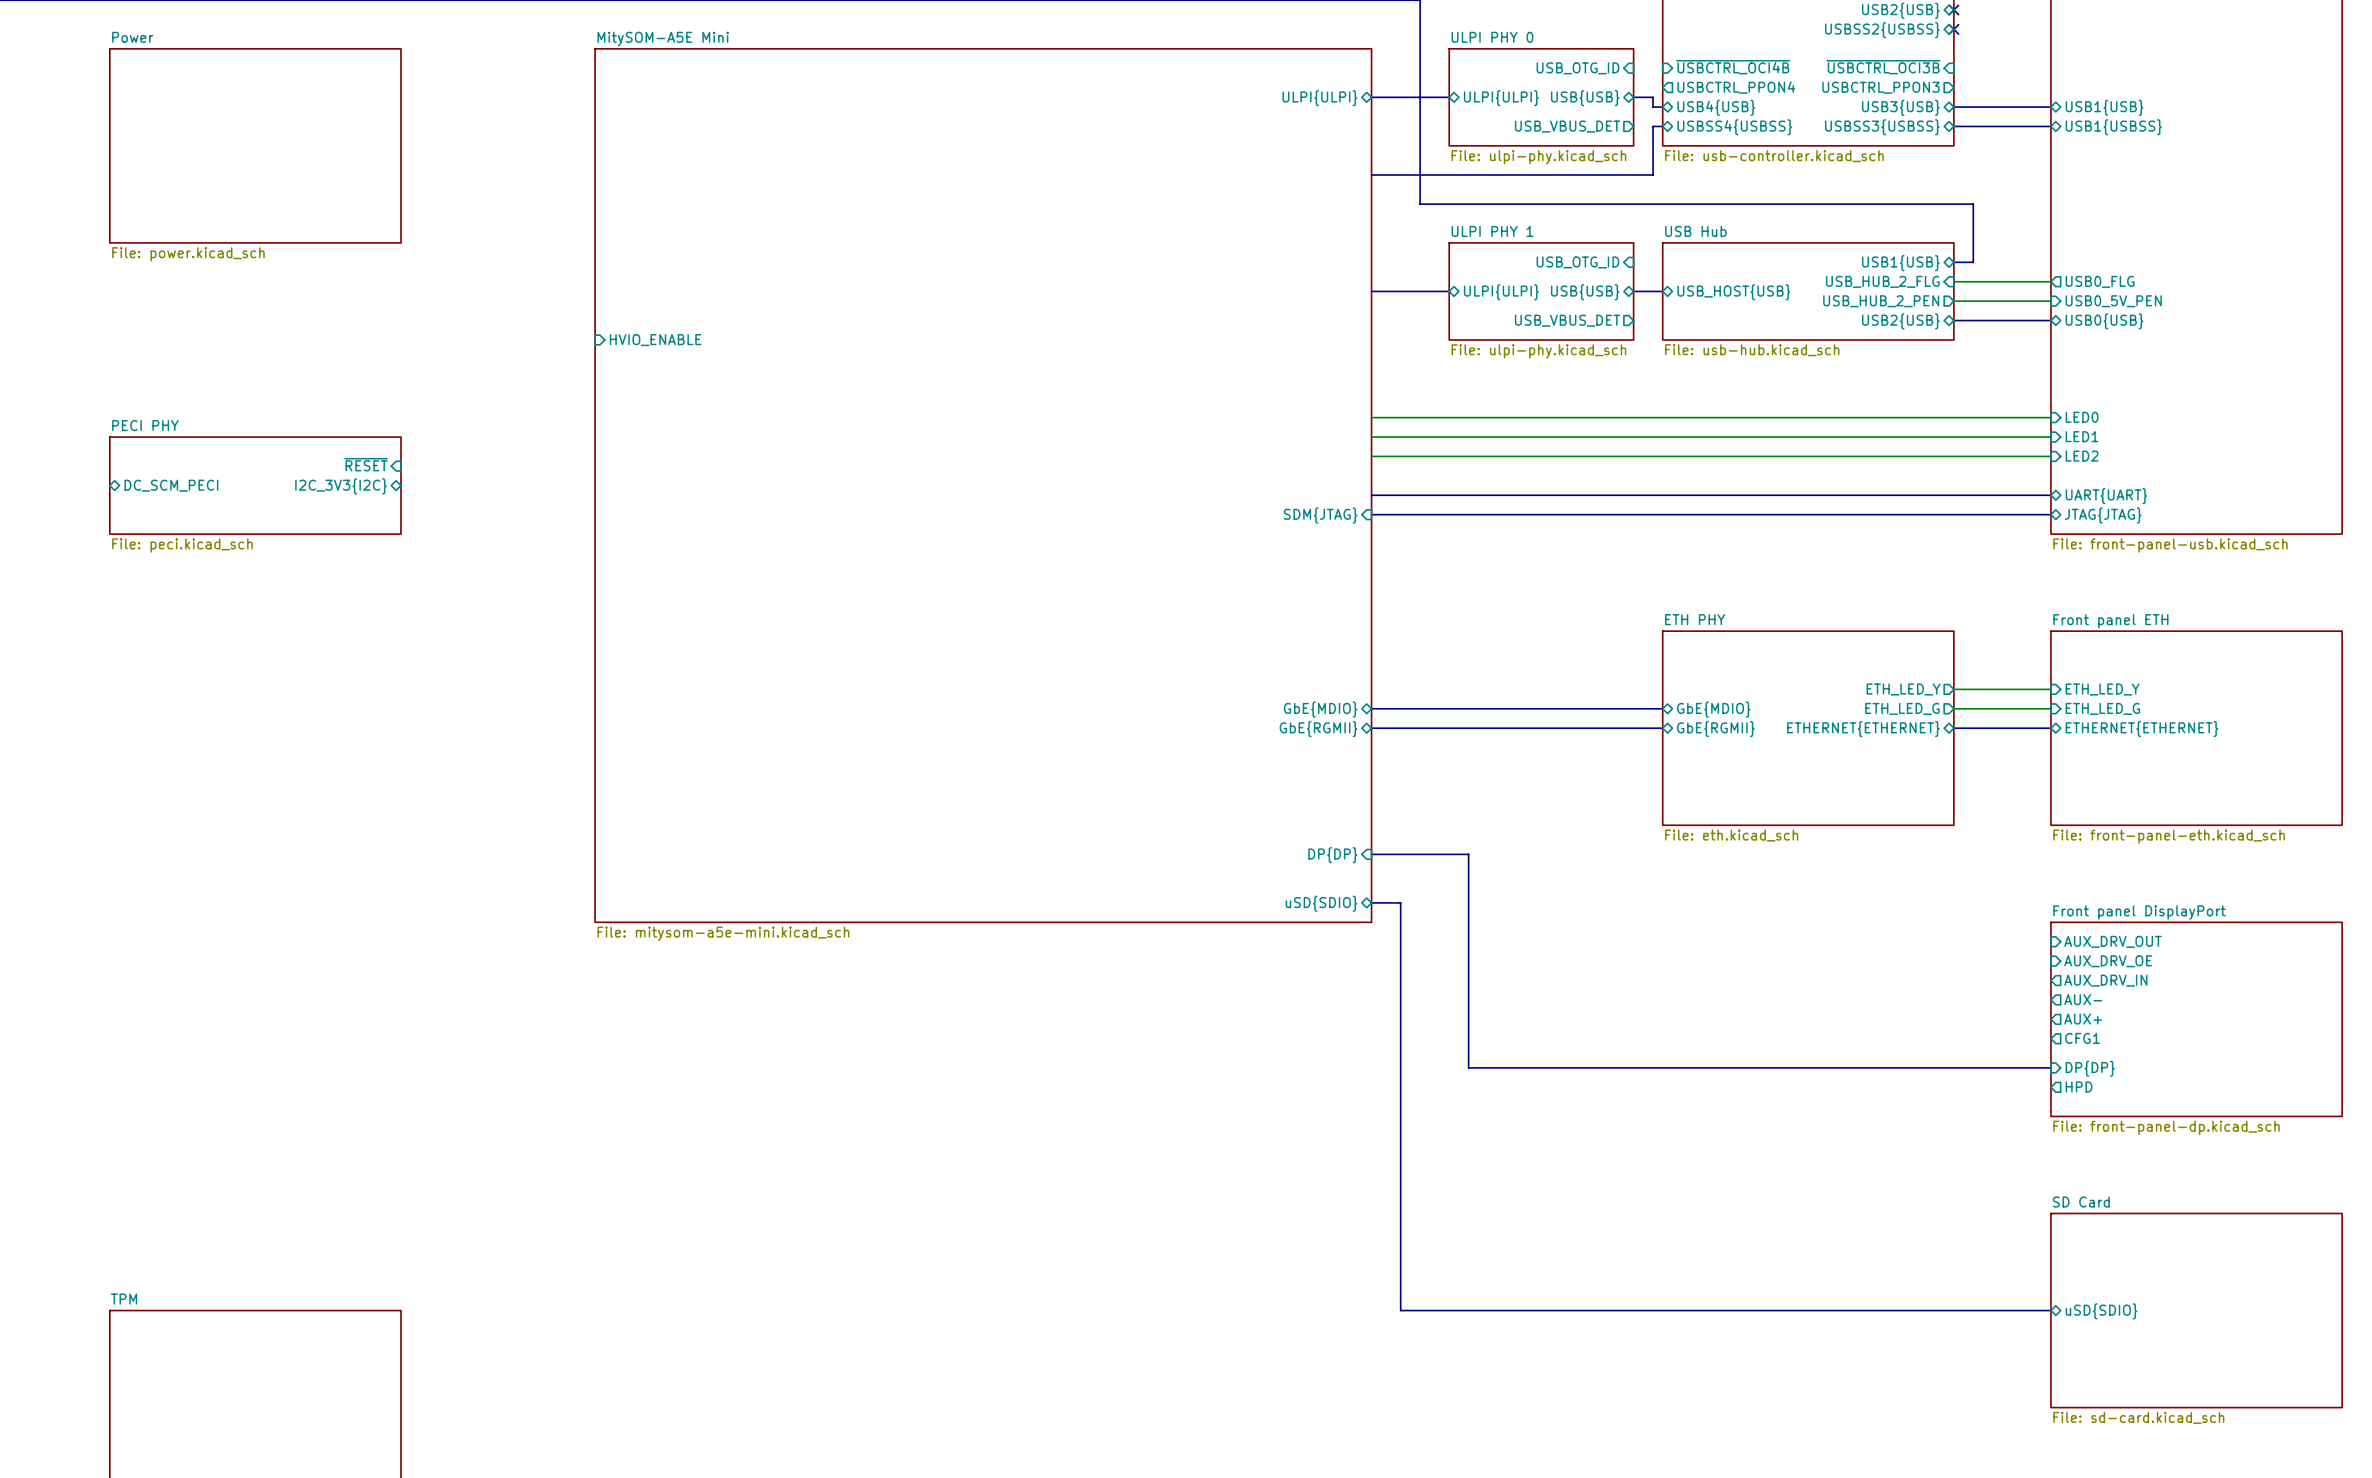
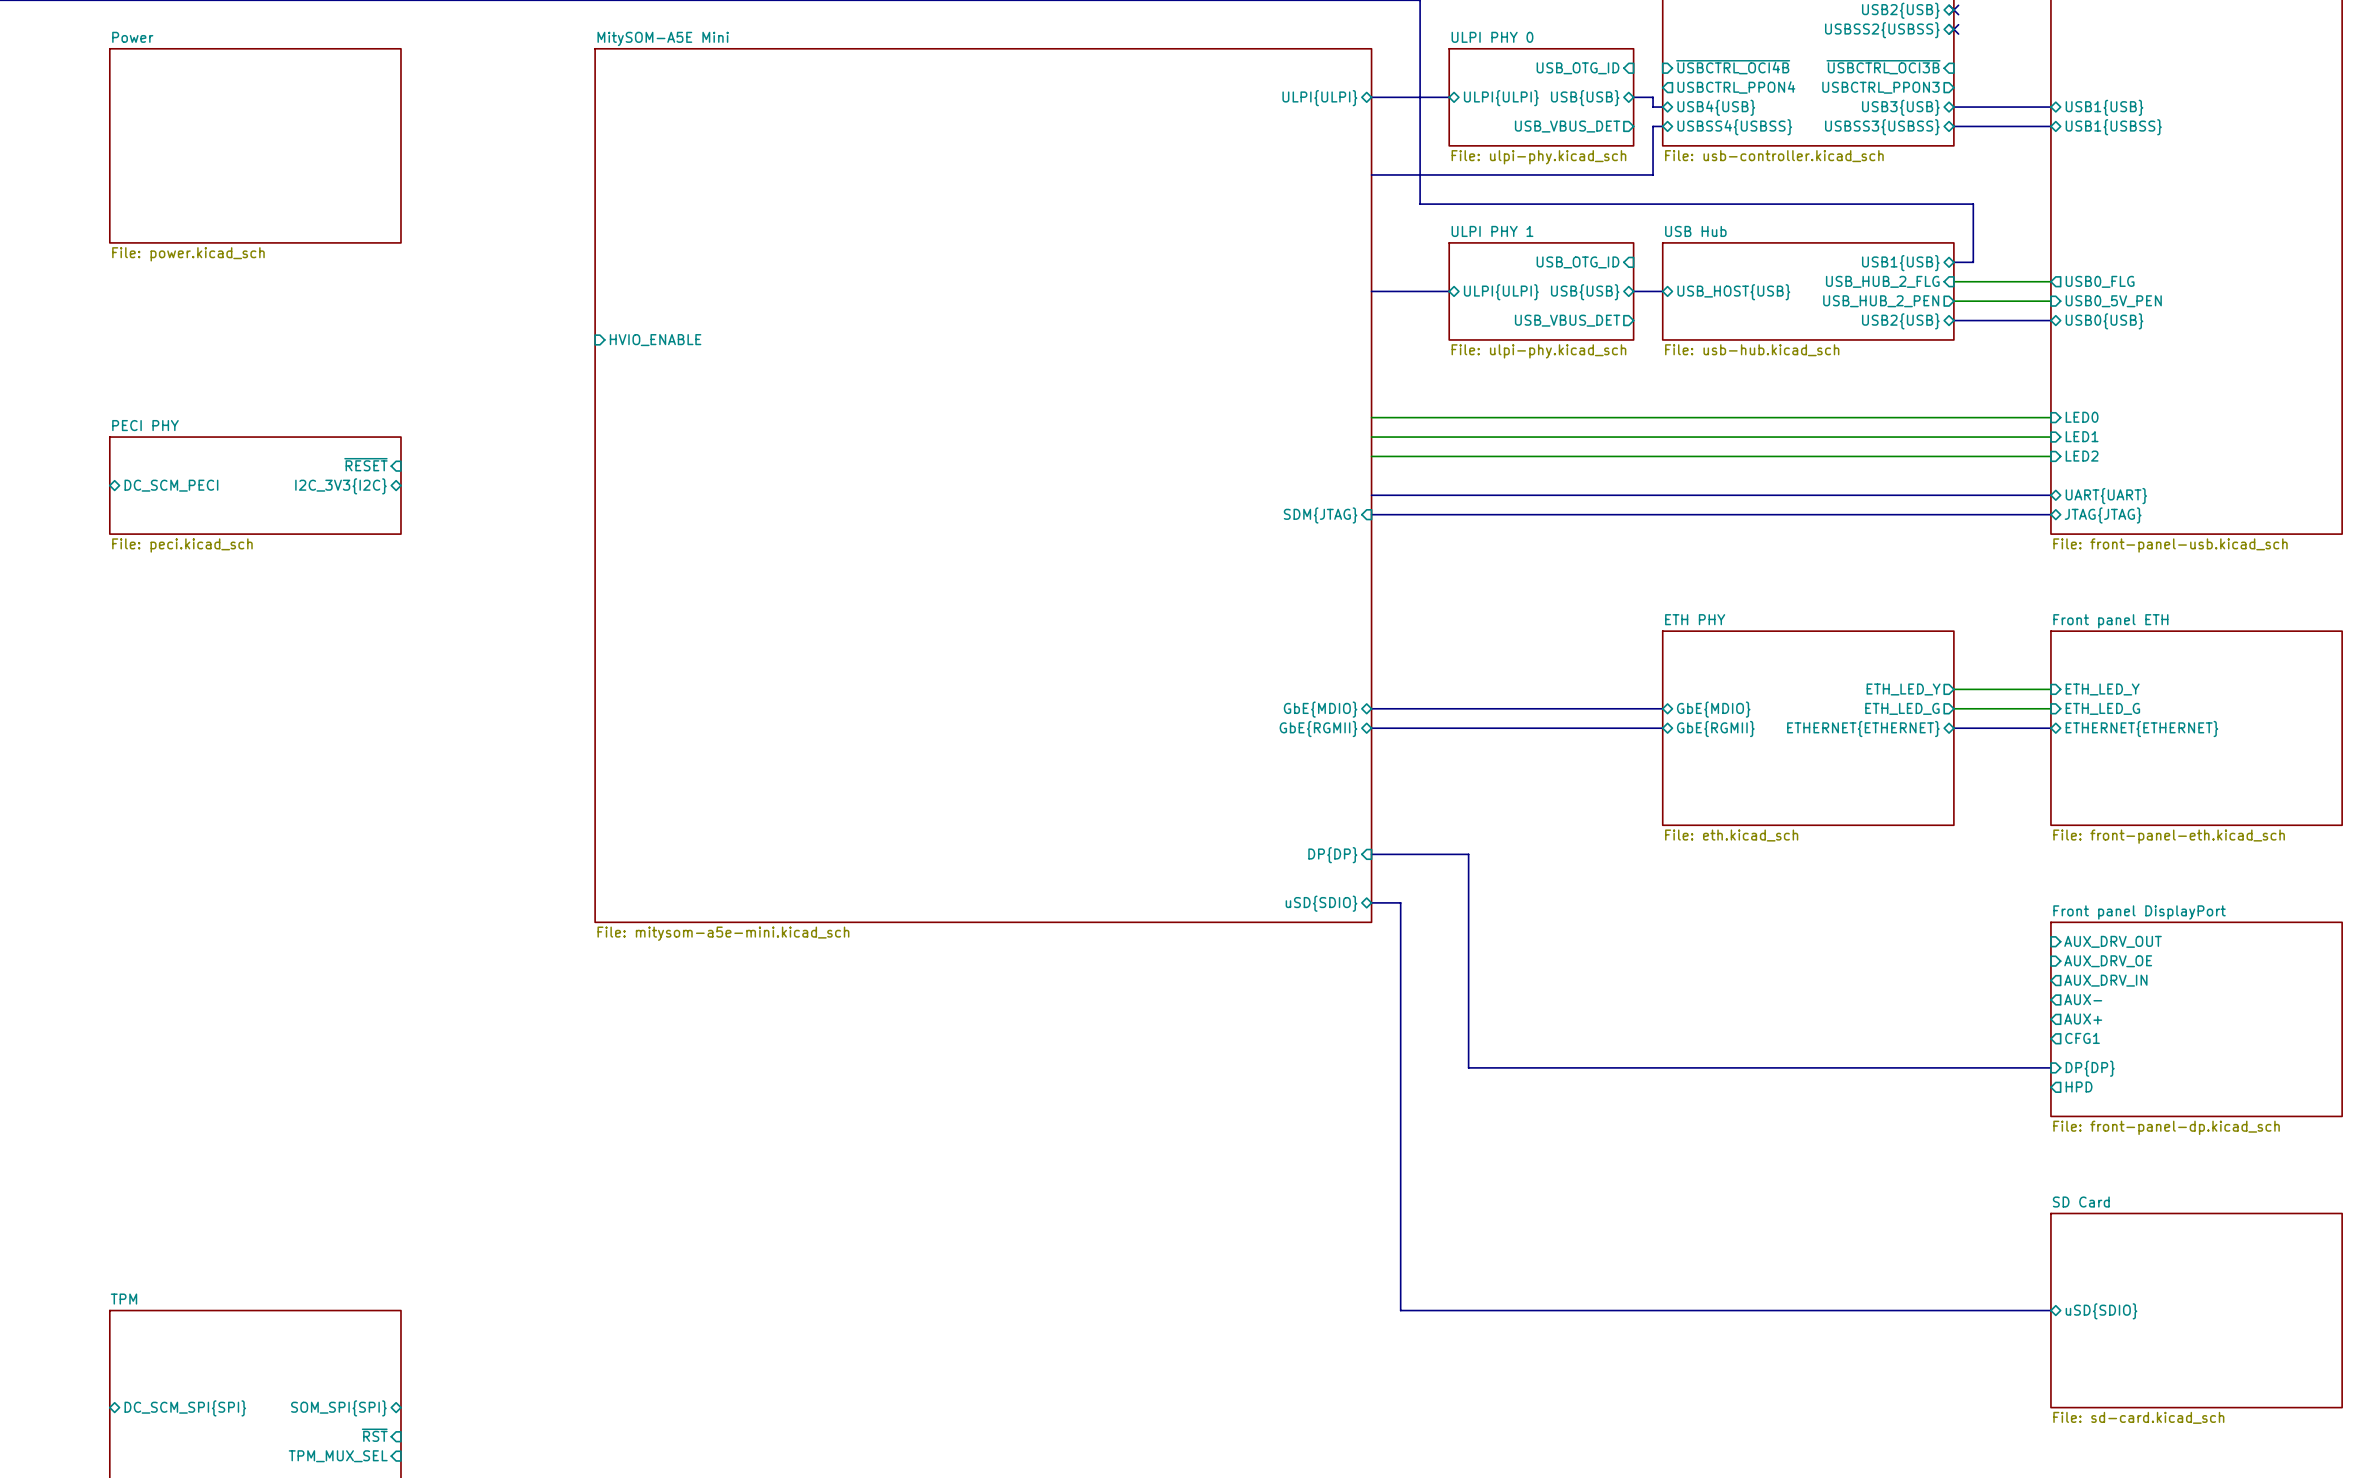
sheet pin: none -> DC_SCM_SPI{SPI} (185, 1408)
sheet pin: none -> SOM_SPI{SPI} (338, 1408)
sheet pin: none -> ~{RST} (374, 1435)
sheet pin: none -> TPM_MUX_SEL (338, 1456)

